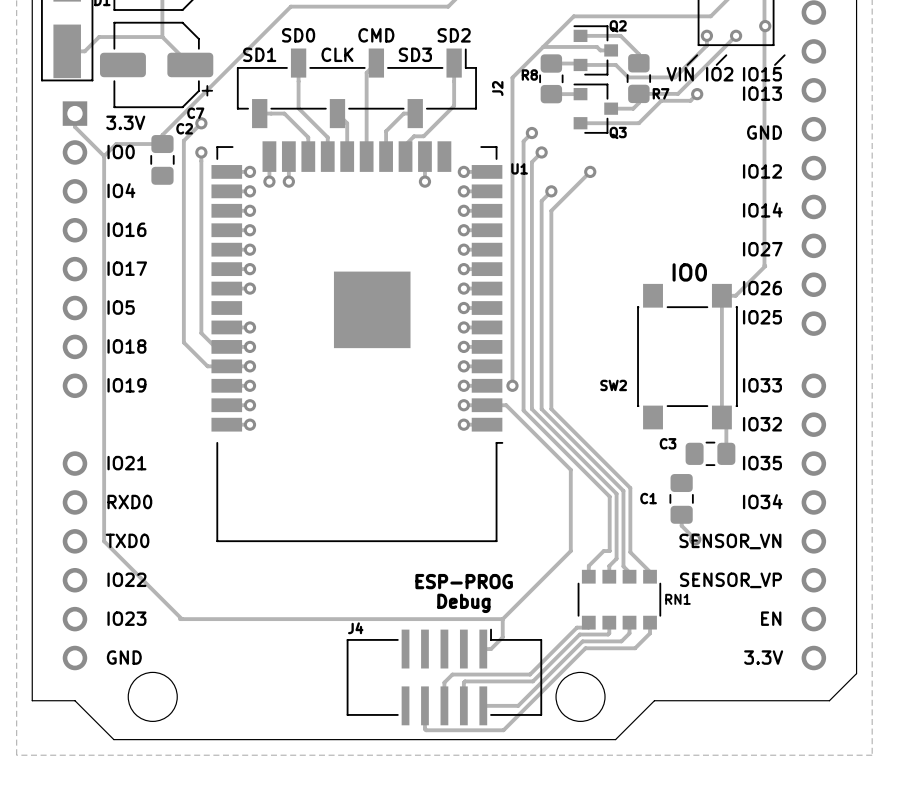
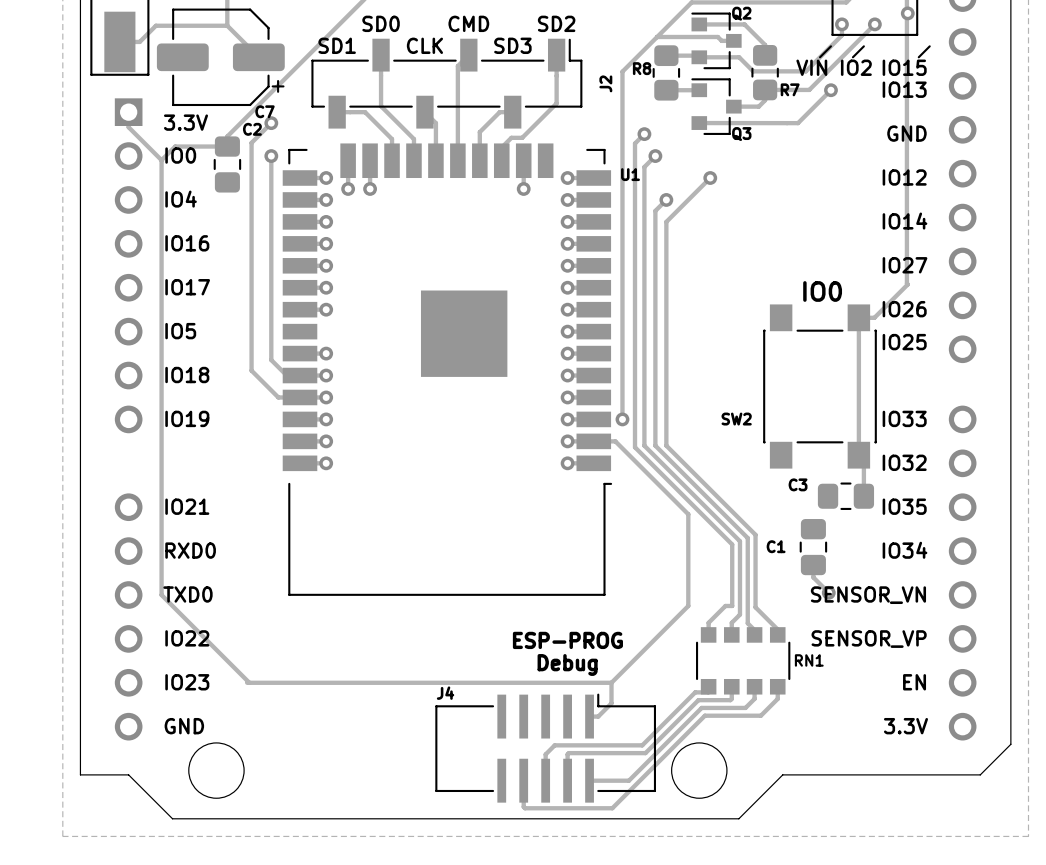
track: (690, 100) (661, 100) (638, 123) (580, 123) -> (823, 97) (798, 123) (699, 123)

